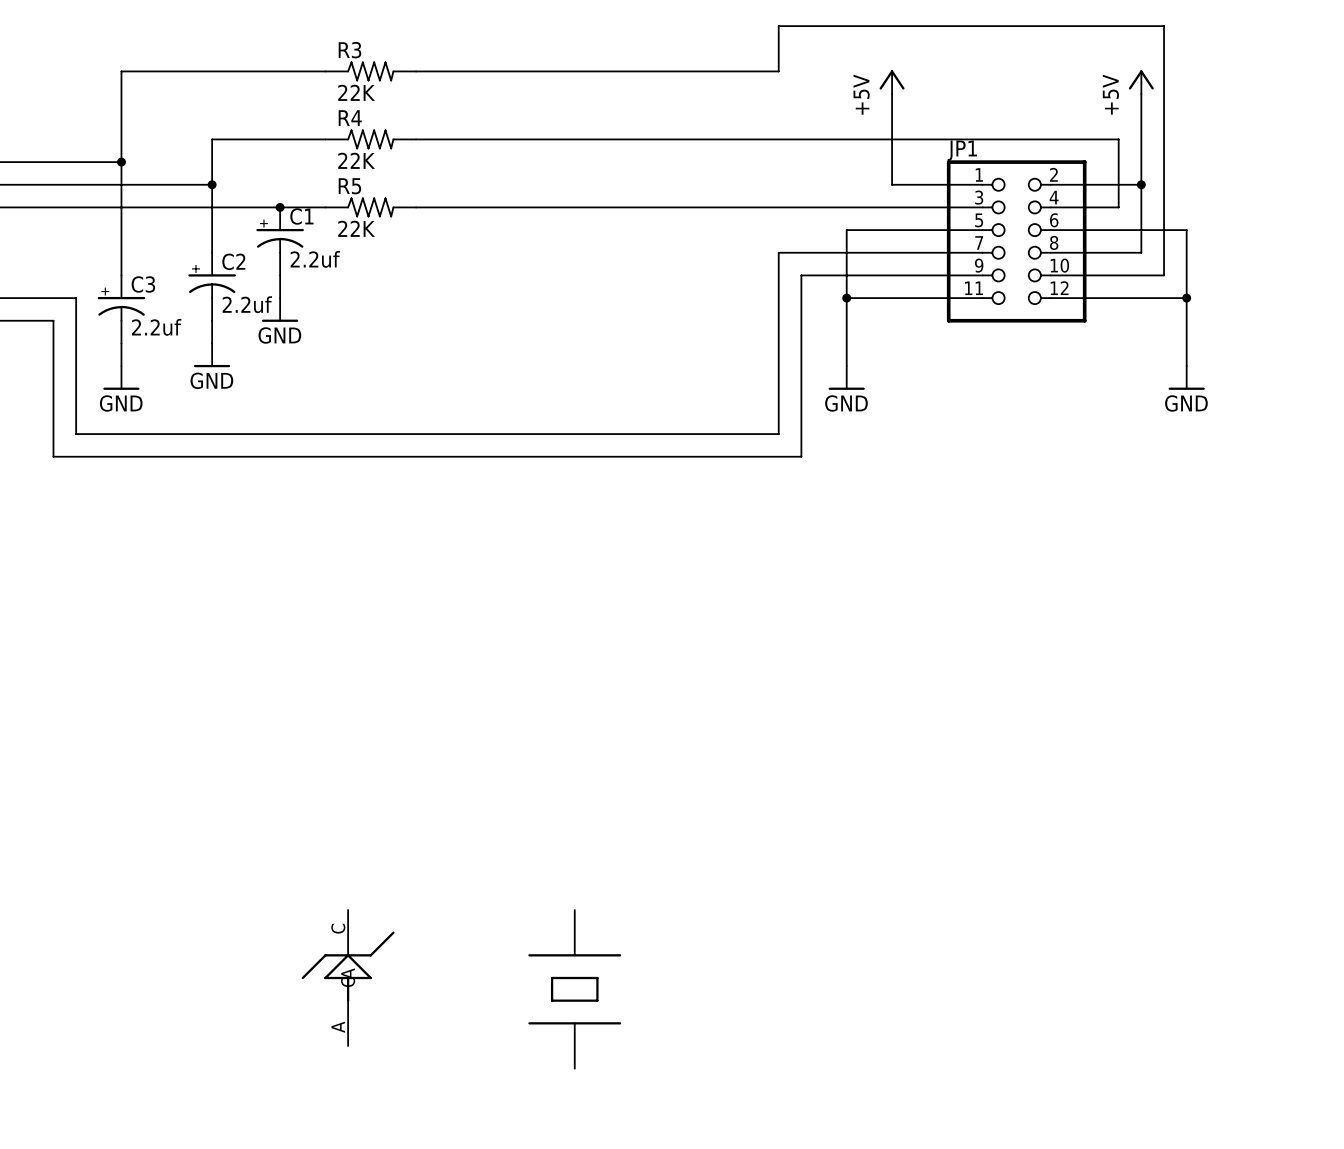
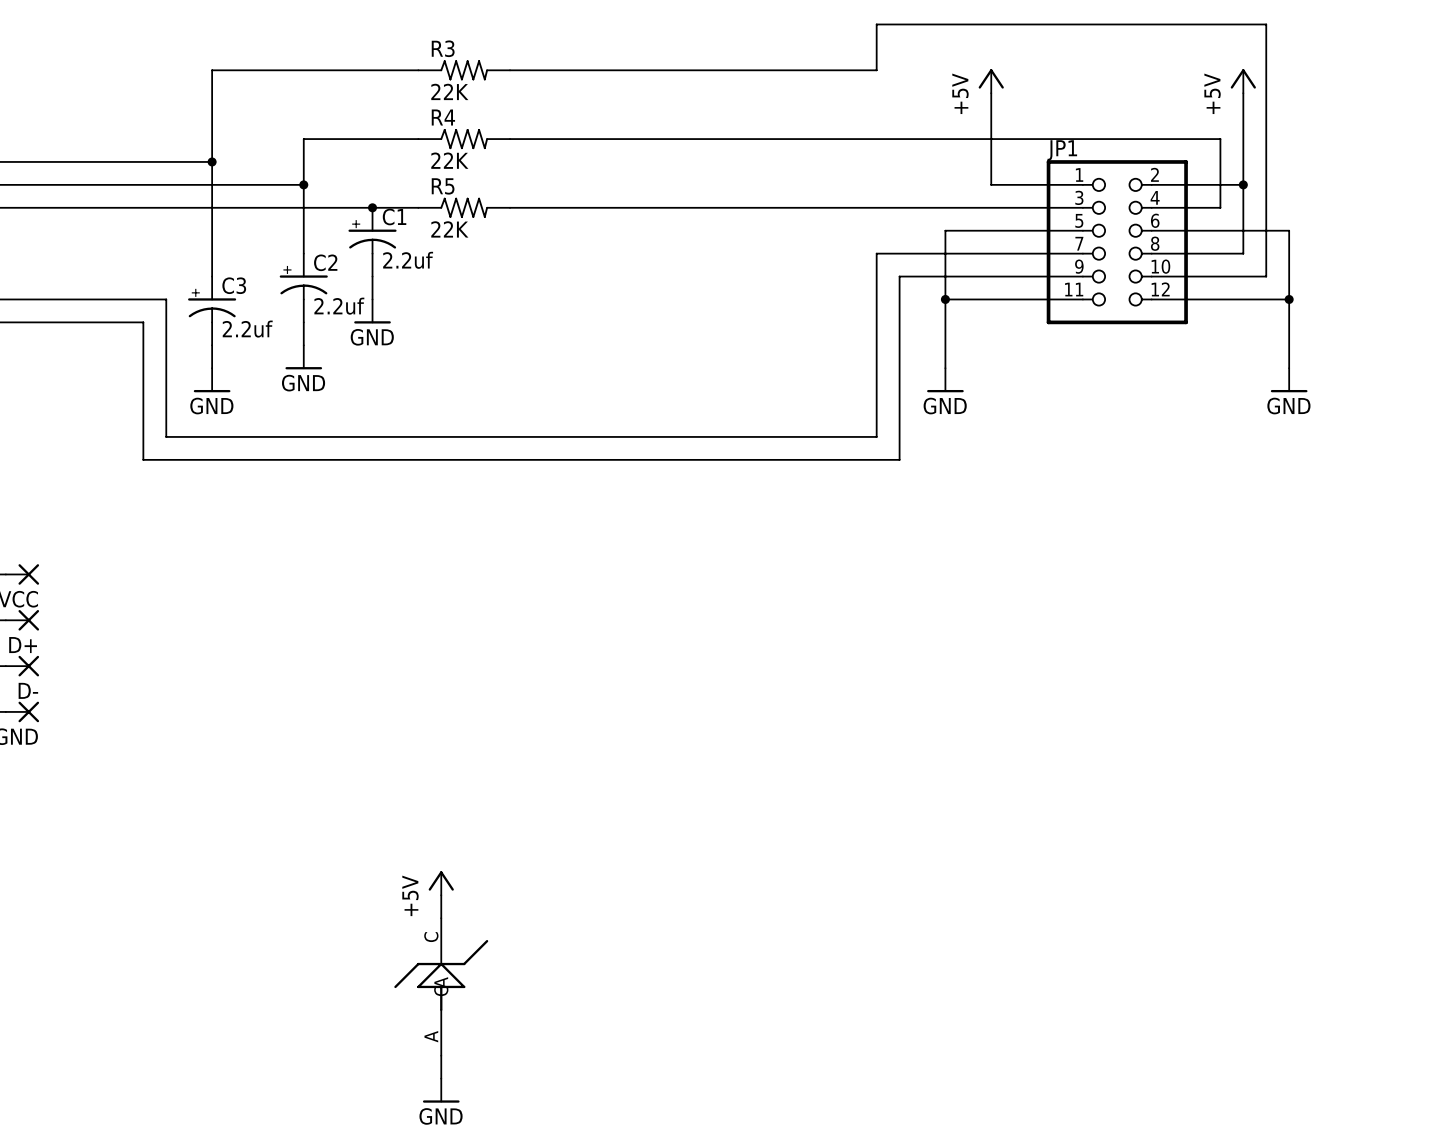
power symbol: none -> +5V (441, 883)
wire: none -> (441, 895) (441, 918)
part: (574, 989) -> none
wire: none -> (441, 1055) (441, 1078)
power symbol: none -> GND (441, 1090)

